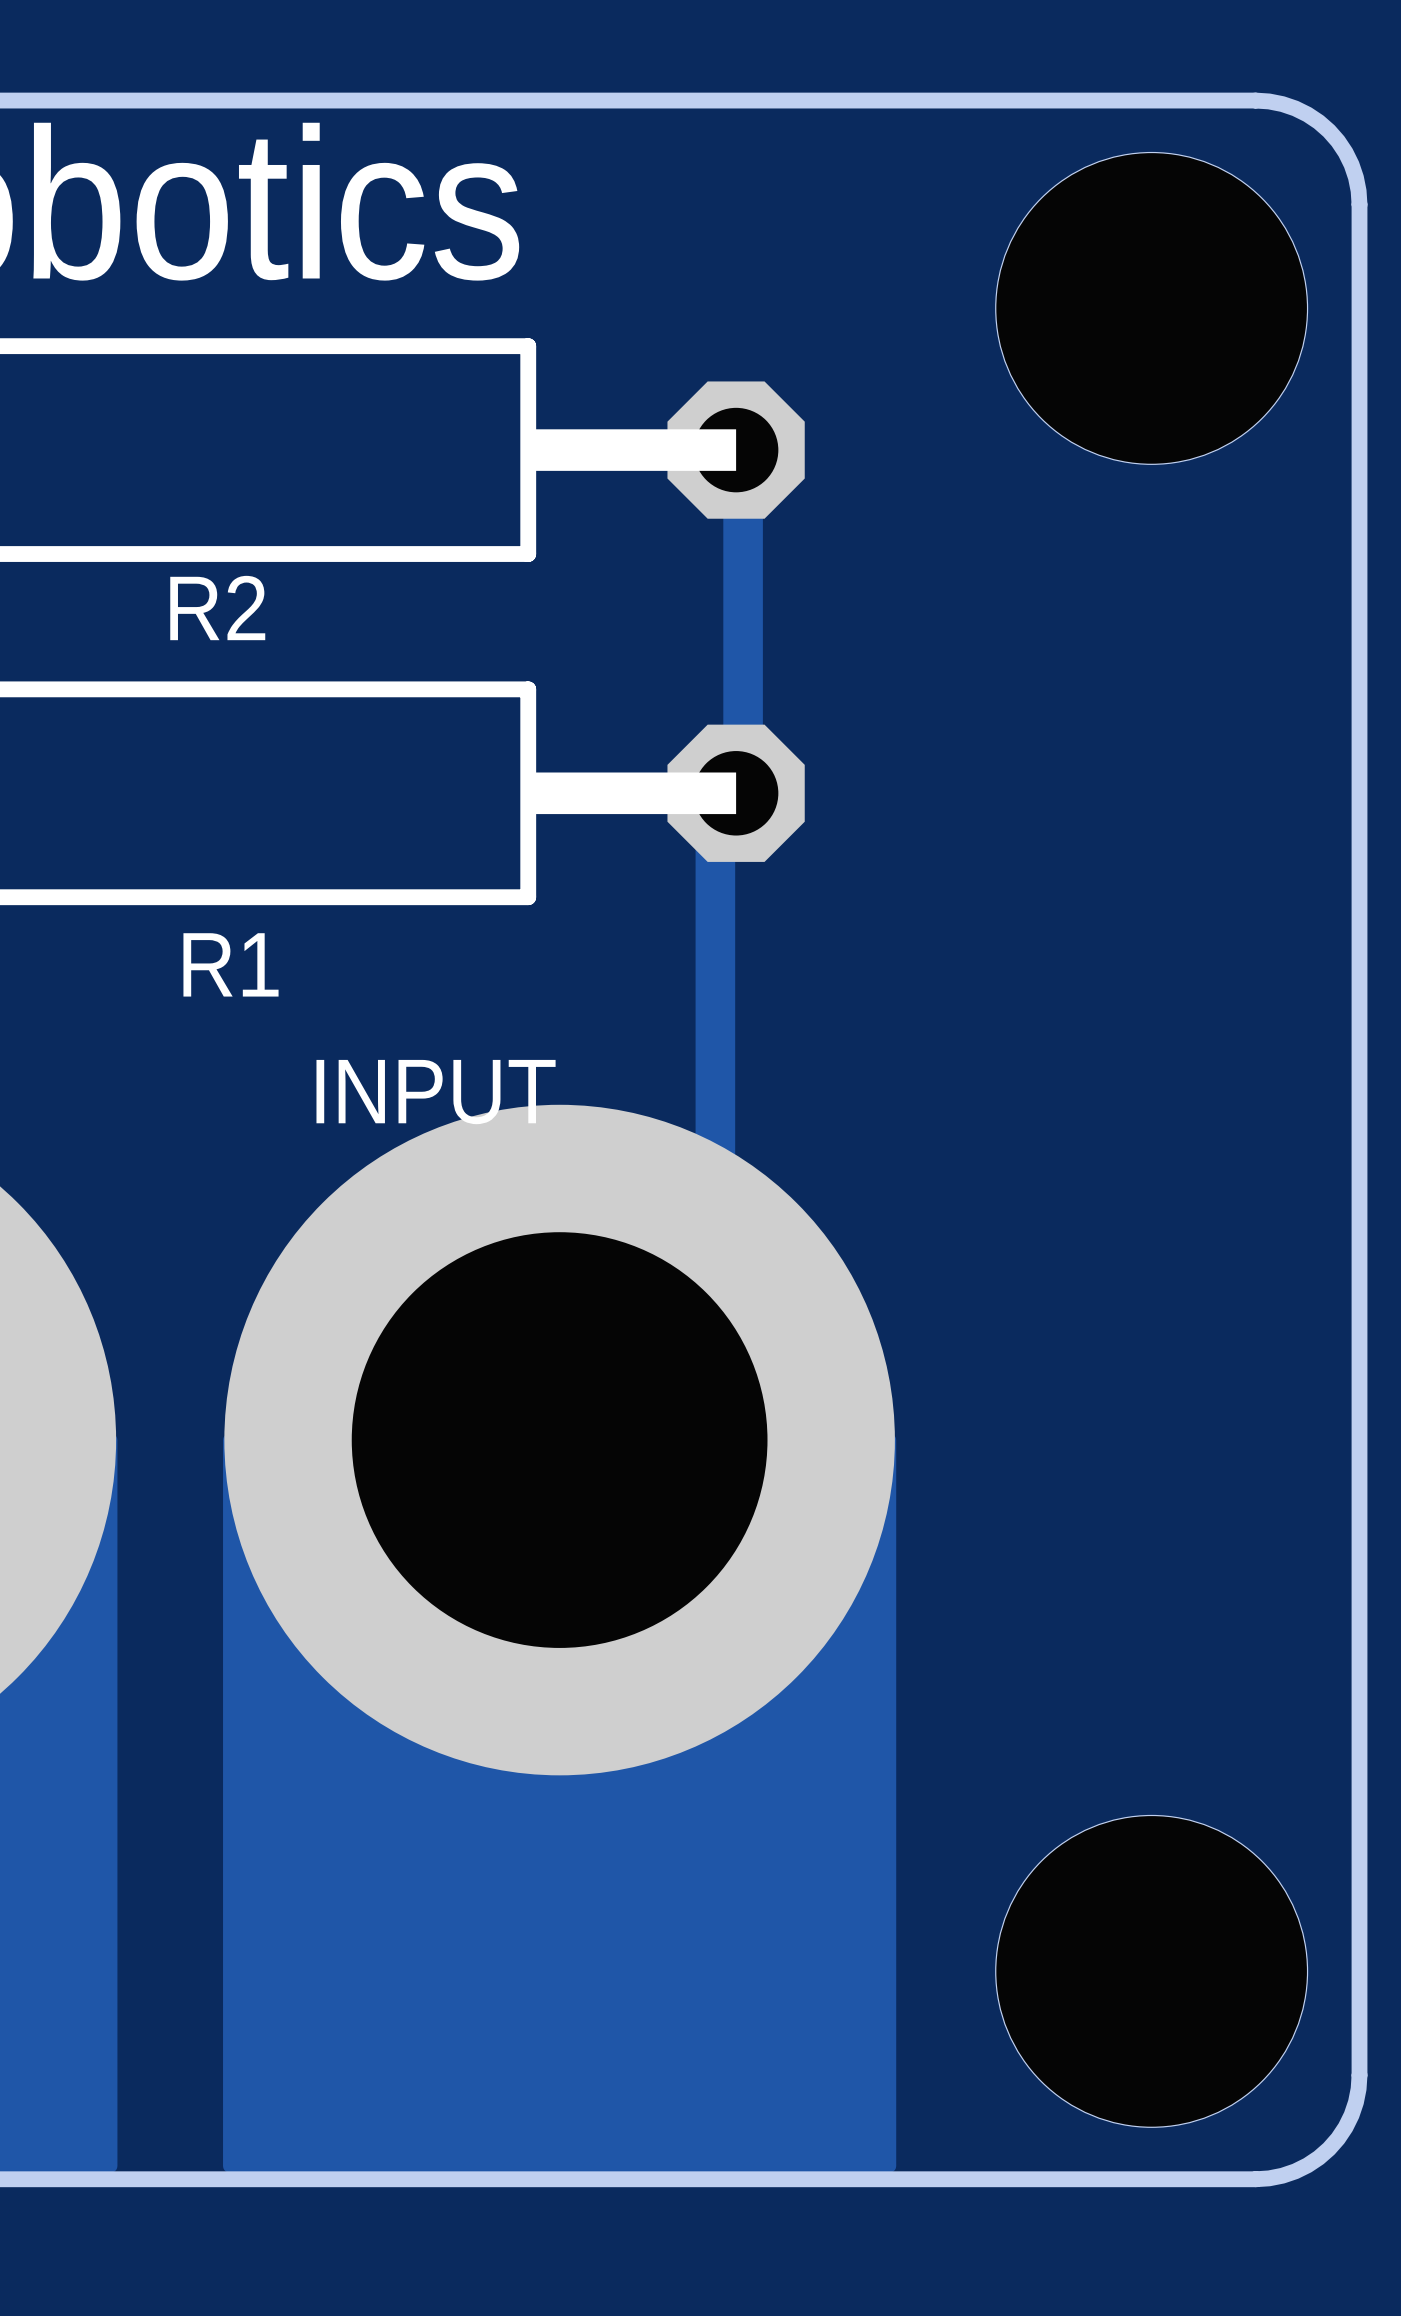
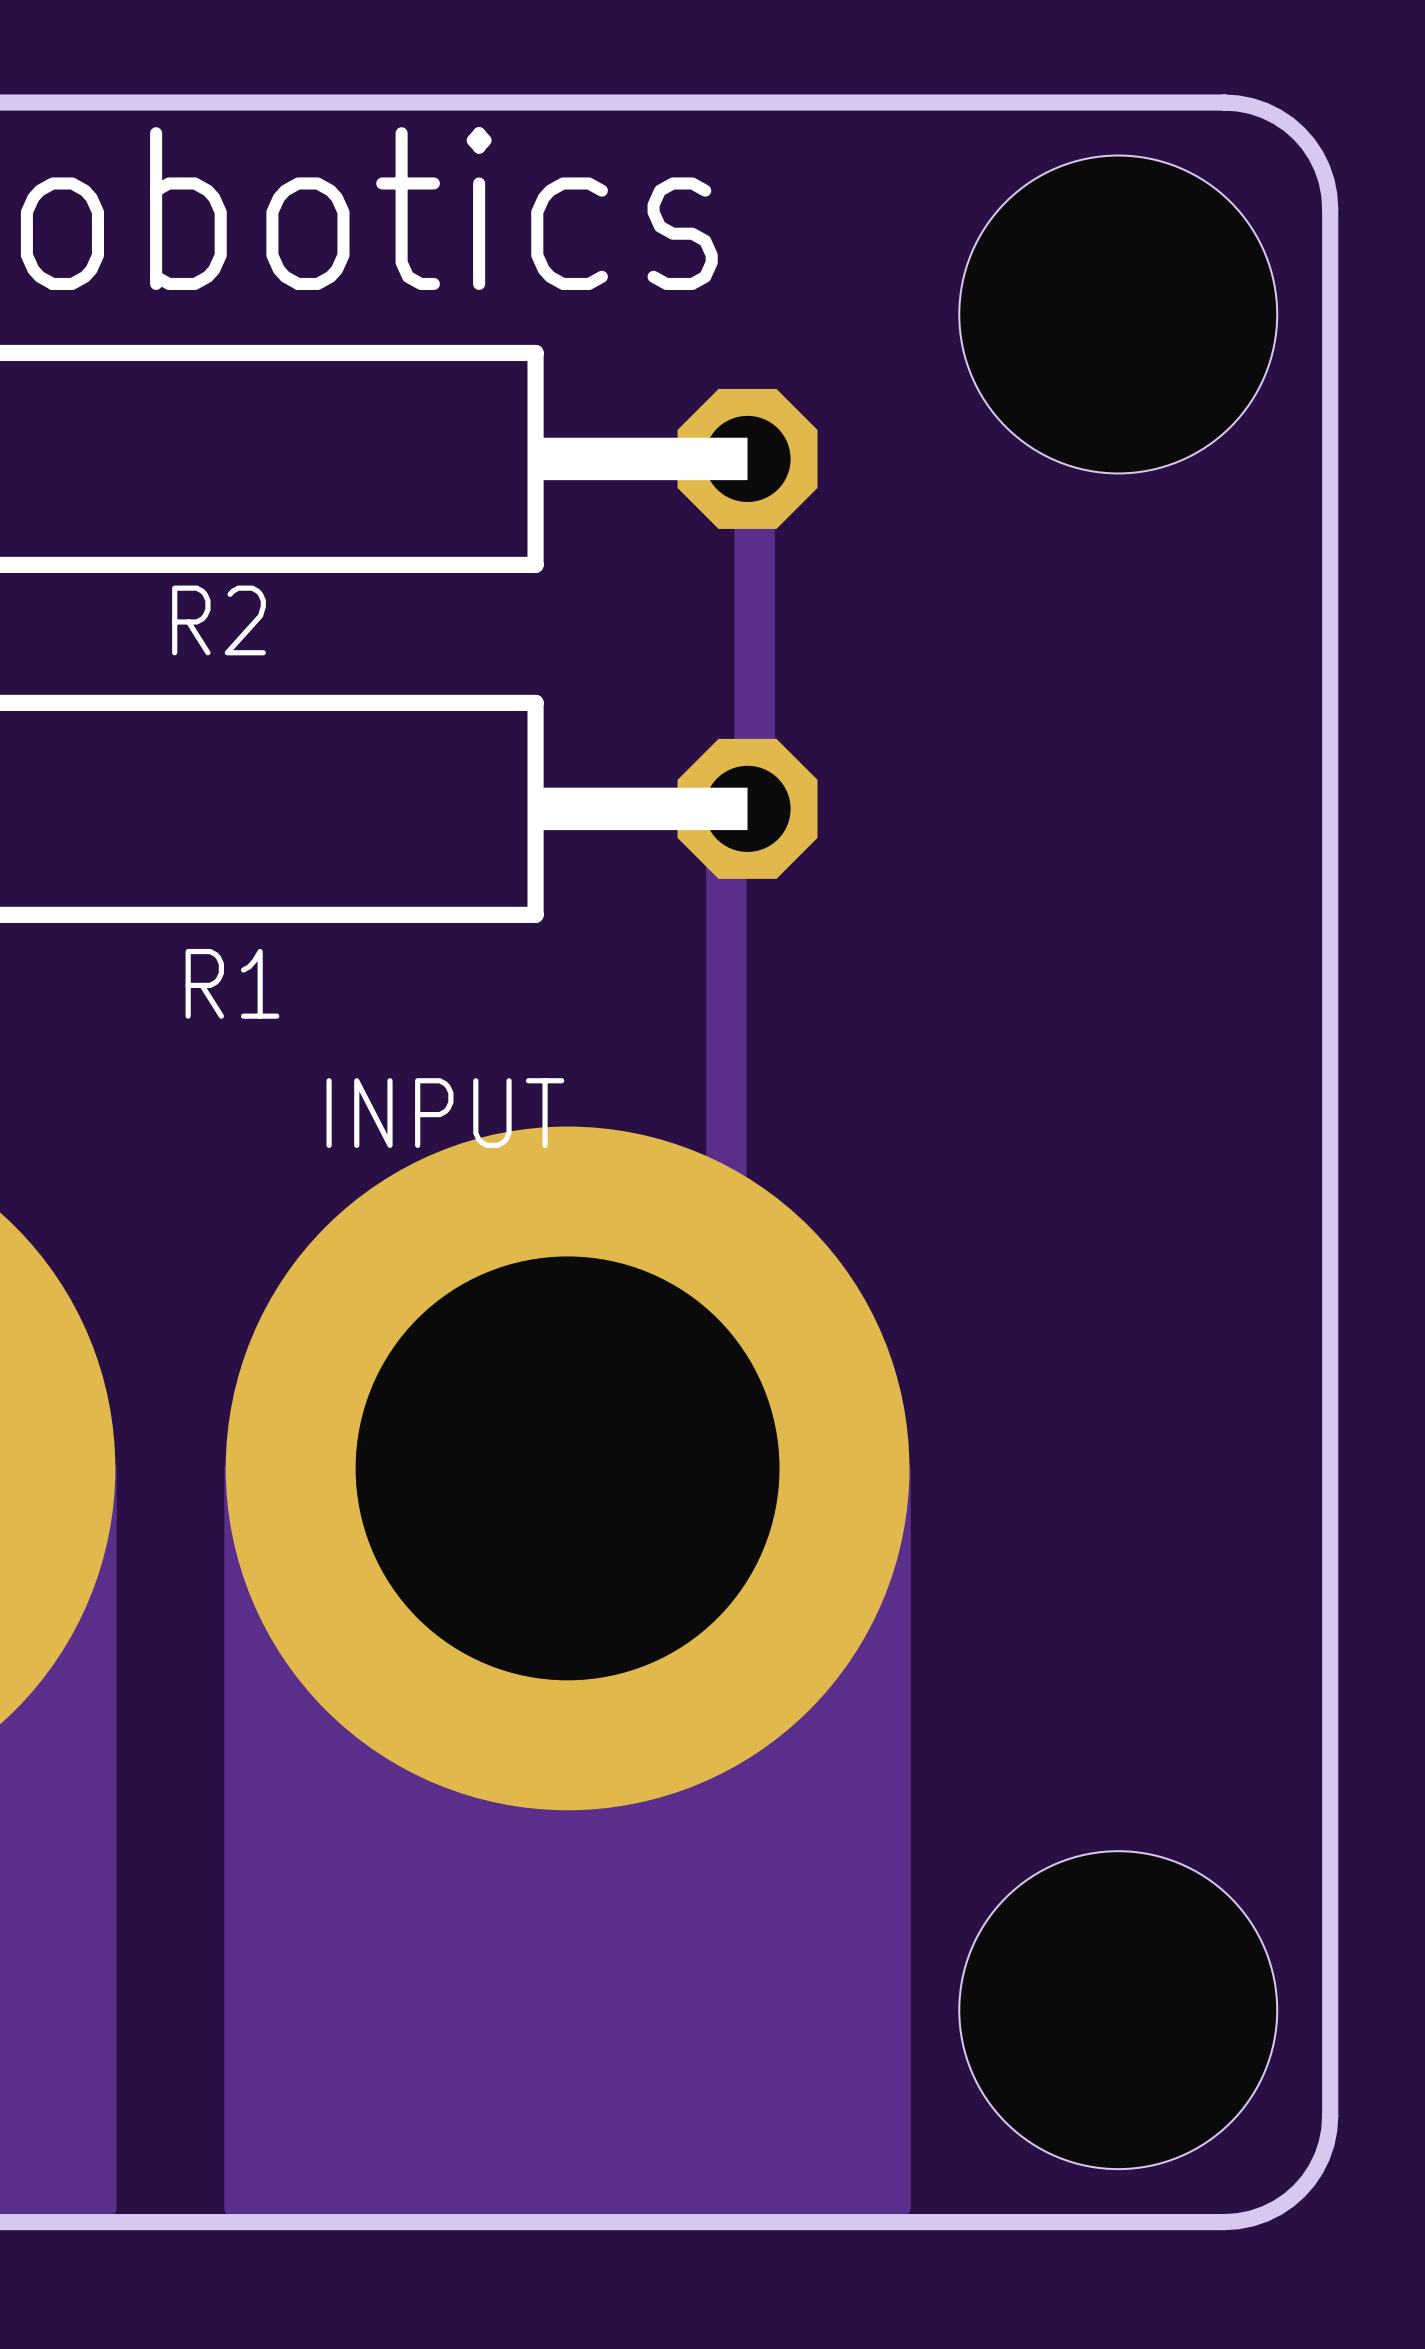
board edge: (1203, 100) (1269, 101) (1295, 108) (1307, 114) (1329, 130) (1345, 152) (1355, 177) (1359, 204) (1358, 2088) (1351, 2115) (1338, 2138) (1318, 2157) (1307, 2165) (1295, 2171) (1269, 2178) (1203, 2179) -> (1224, 102) (1251, 106) (1264, 110) (1288, 124) (1299, 133) (1308, 143) (1322, 167) (1326, 181) (1330, 208) (1330, 2116) (1326, 2143) (1322, 2156) (1308, 2180) (1299, 2191) (1288, 2200) (1264, 2214) (1251, 2218) (1224, 2222)
hole position: (1151, 308) -> (1118, 314)
hole position: (1151, 1971) -> (1118, 2010)

